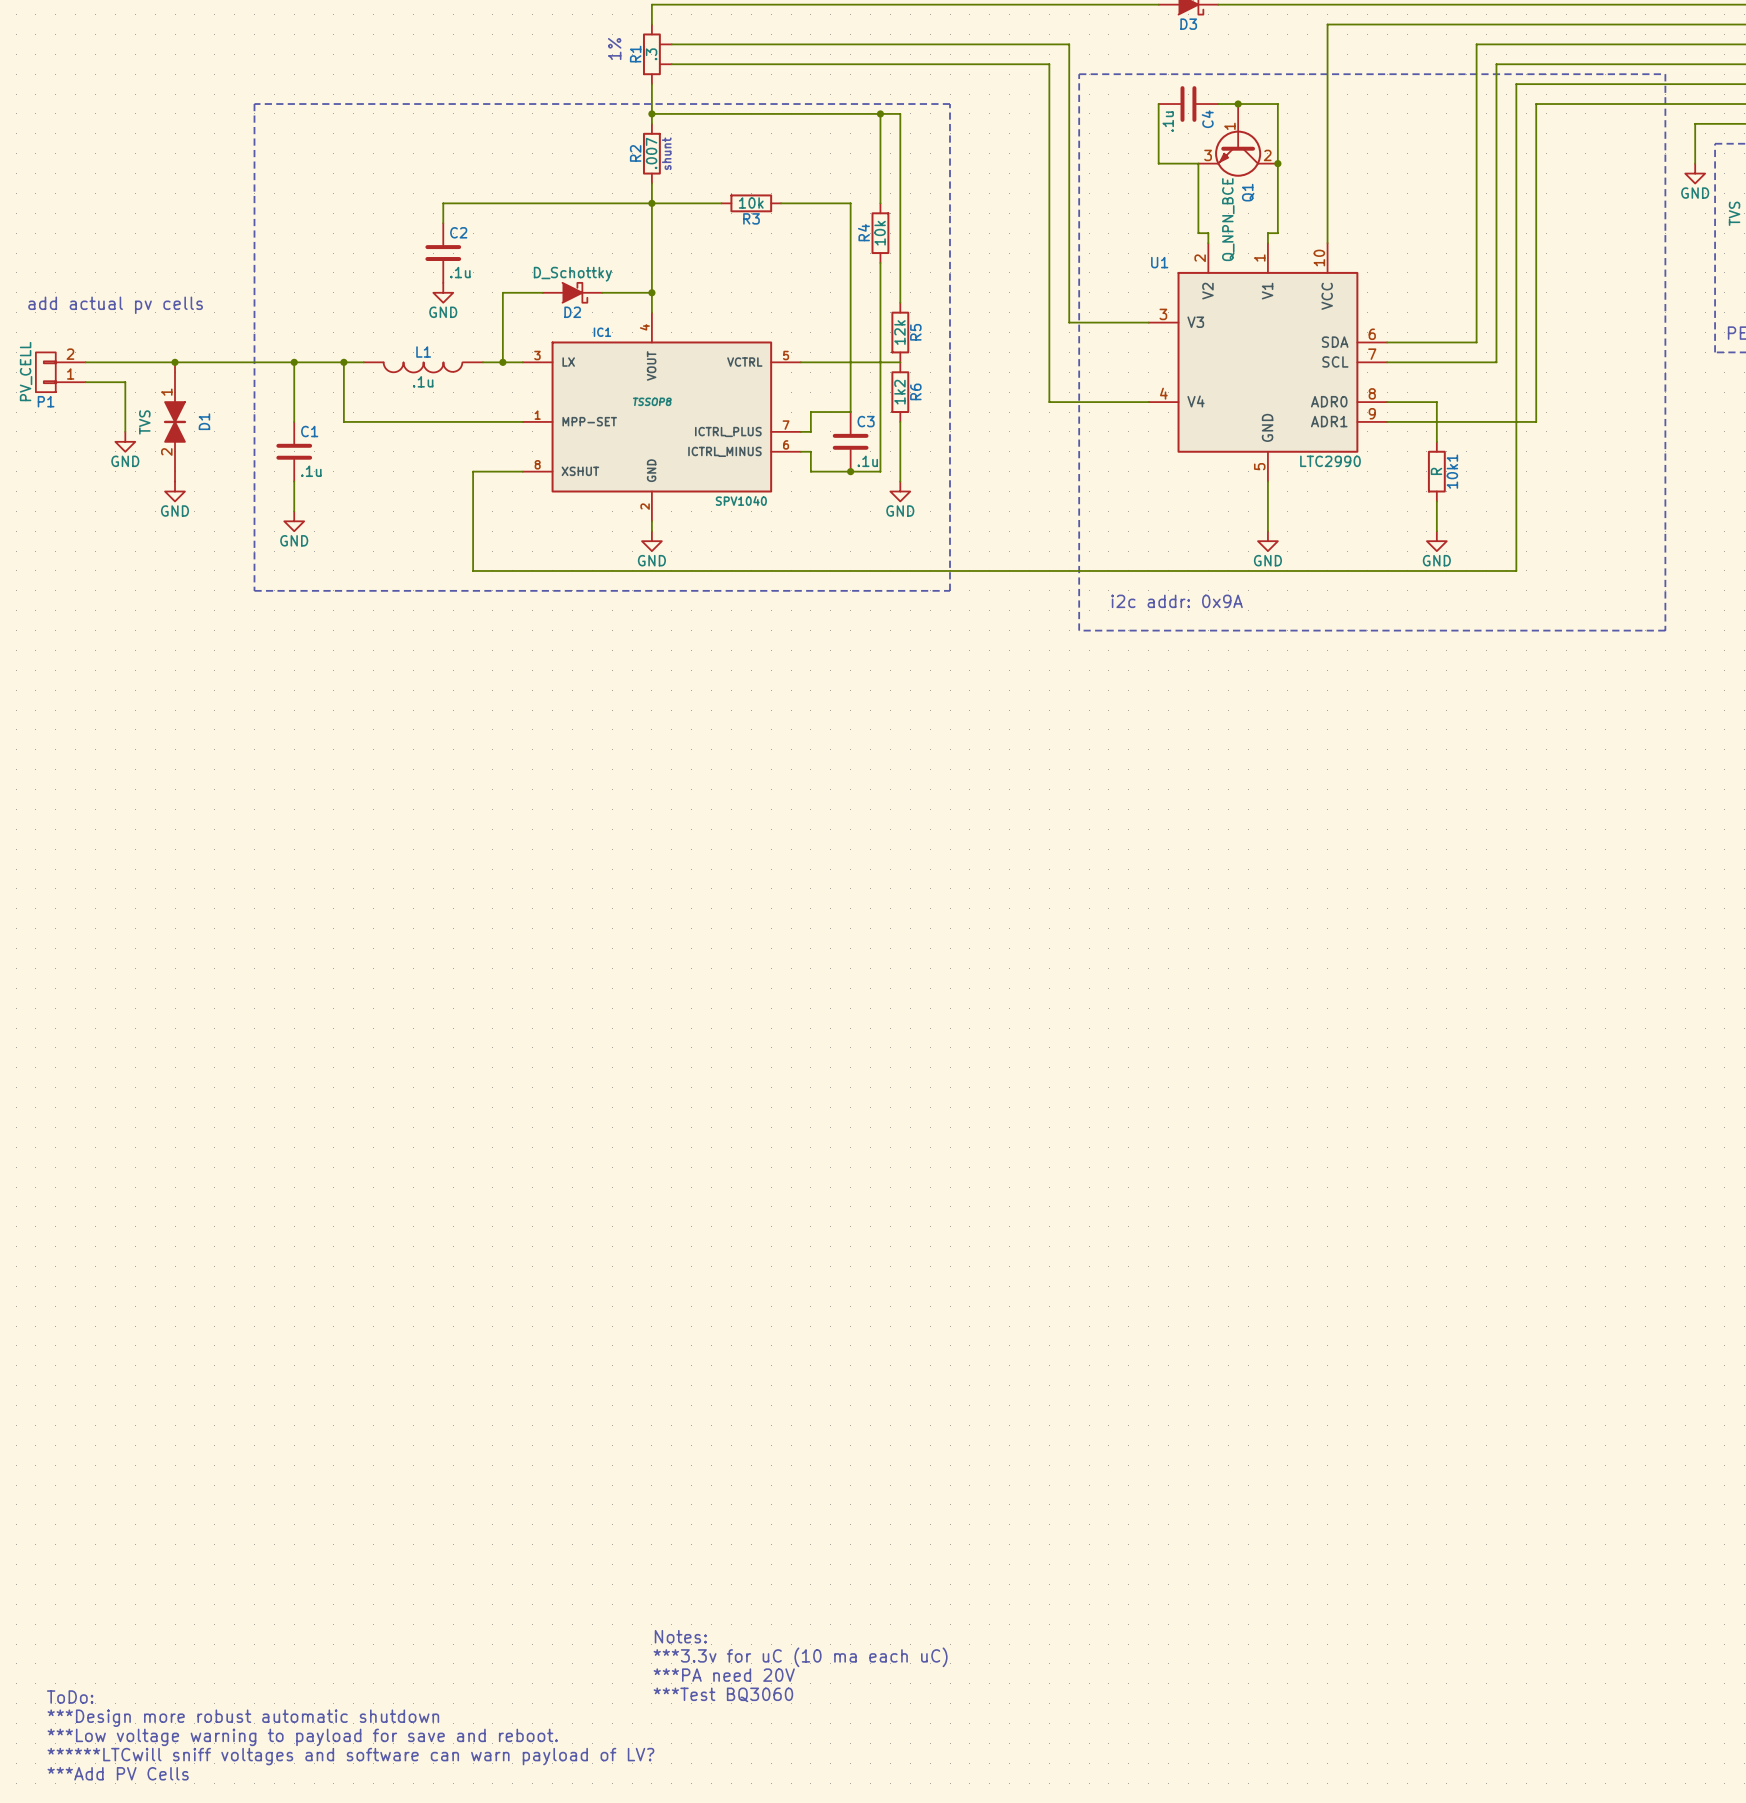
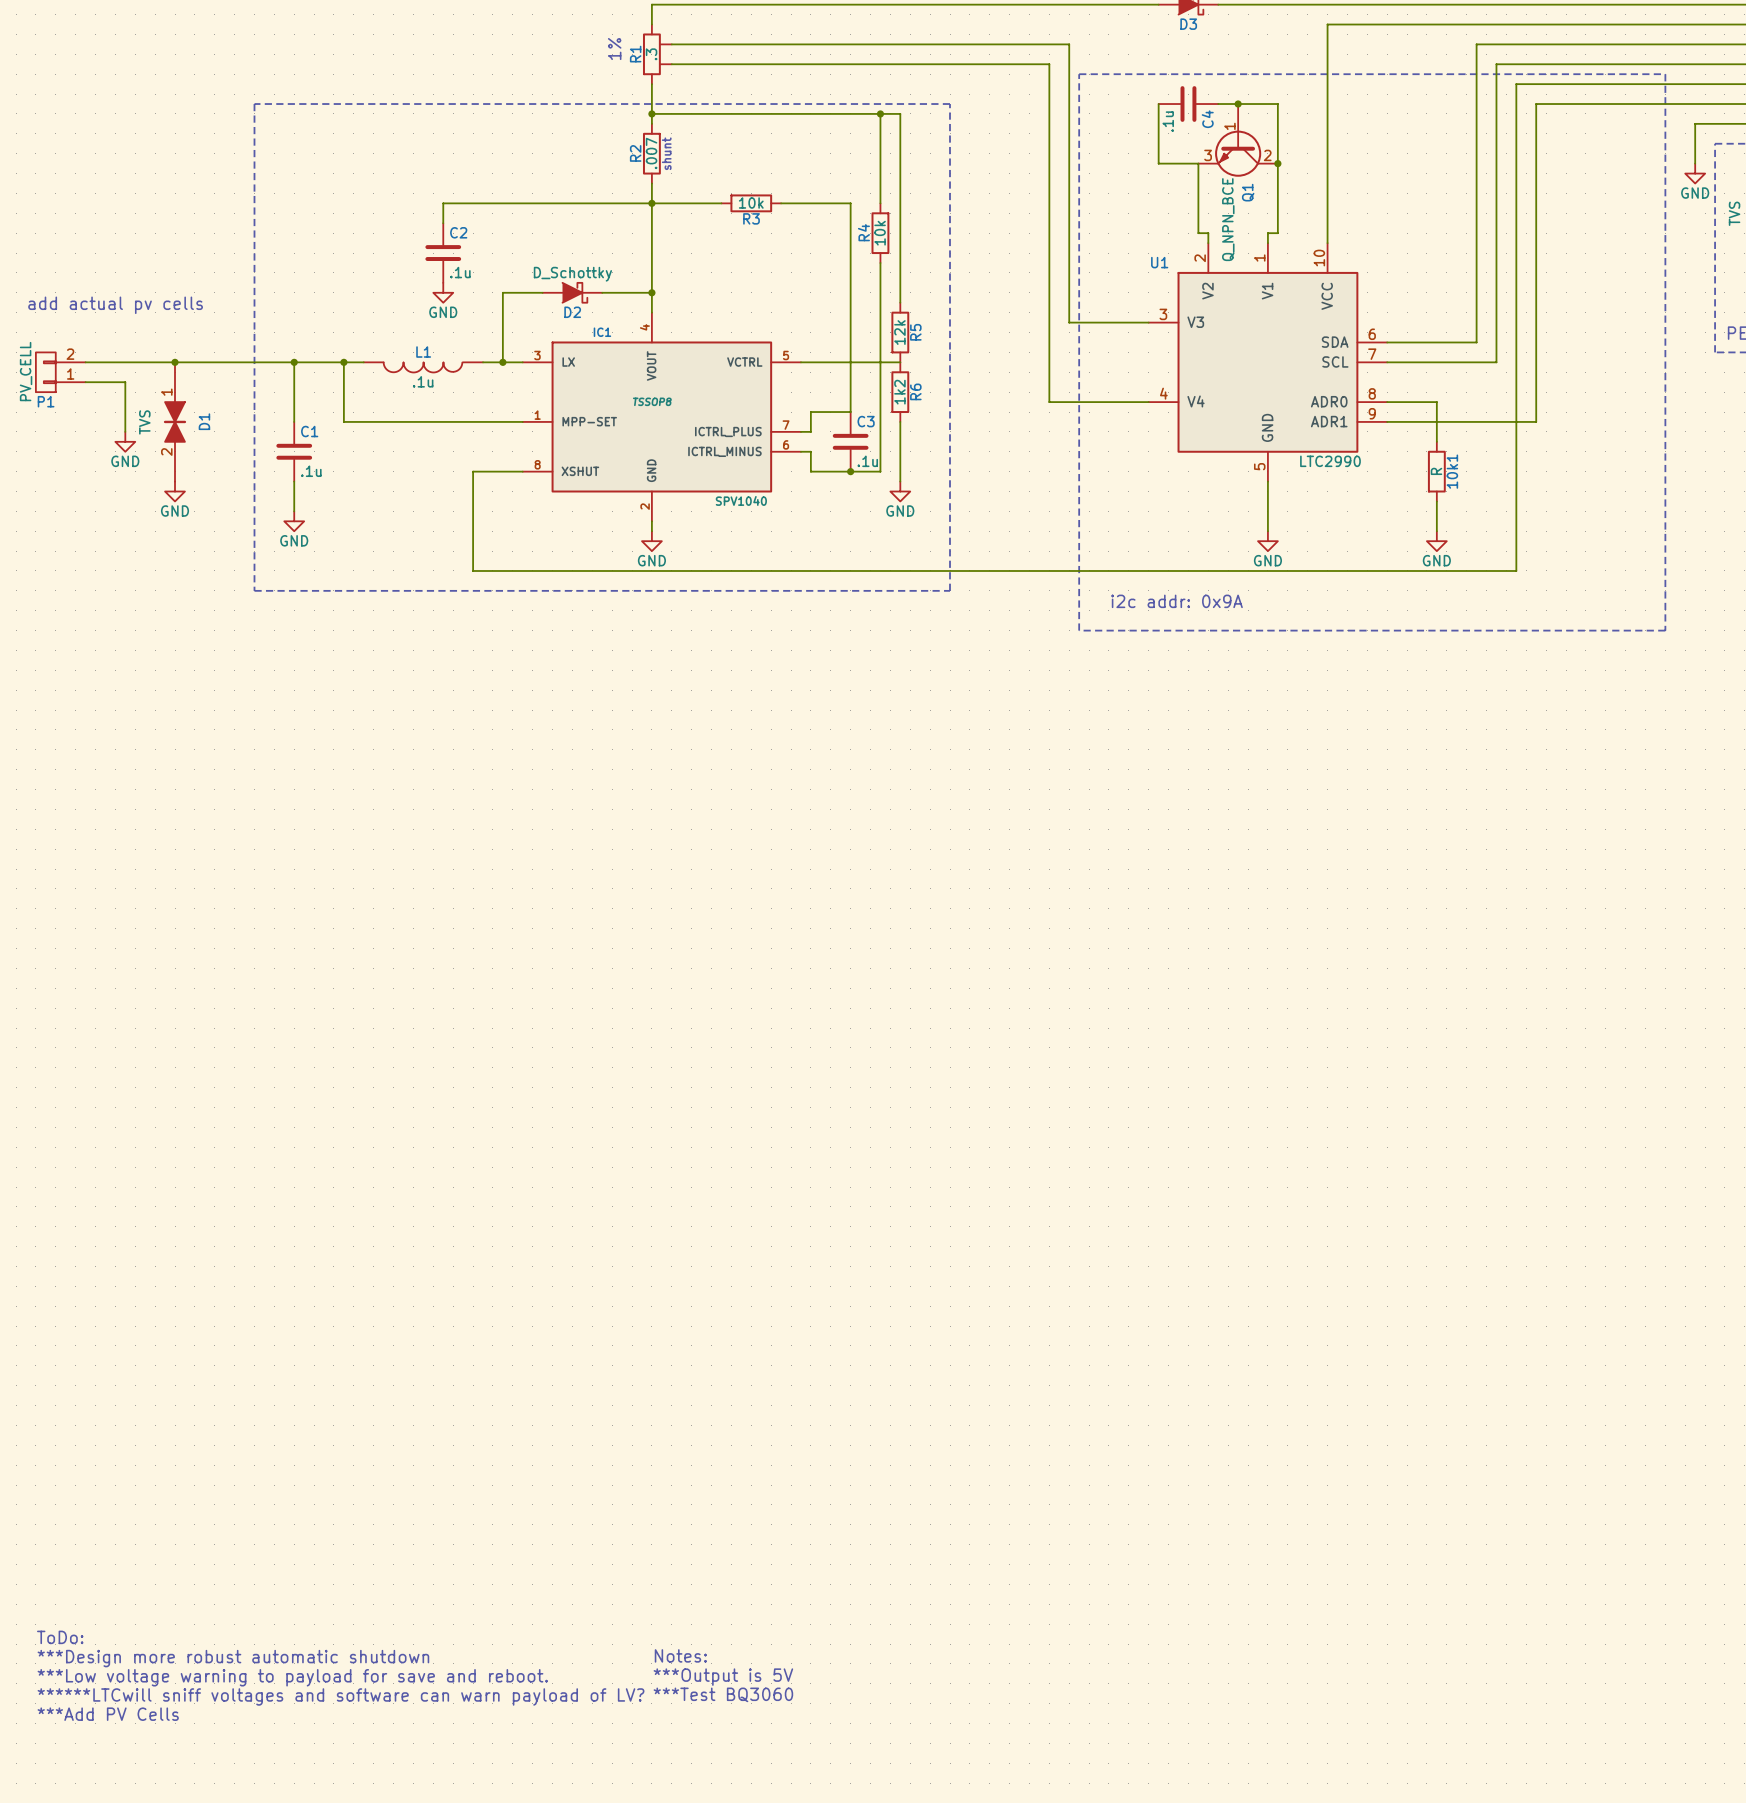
text: Notes: (680, 1636) -> none
text: ***3.3v for uC (10 ma each uC) (800, 1657) -> Notes: (680, 1655)
text: ***PA need 20V (724, 1675) -> ***Output is 5V (723, 1677)
text position: ToDo: (70, 1697) -> ToDo: (60, 1637)
text position: ***Design more robust automatic shutdown (243, 1718) -> ***Design more robust automatic shutdown (233, 1658)
text position: ***Low voltage warning to payload for save and reboot. (302, 1737) -> ***Low voltage warning to payload for save and reboot. (292, 1677)
text position: ******LTCwill sniff voltages and software can warn payload of LV? (350, 1756) -> ******LTCwill sniff voltages and software can warn payload of LV? (341, 1696)
text position: ***Add PV Cells (118, 1773) -> ***Add PV Cells (108, 1714)

